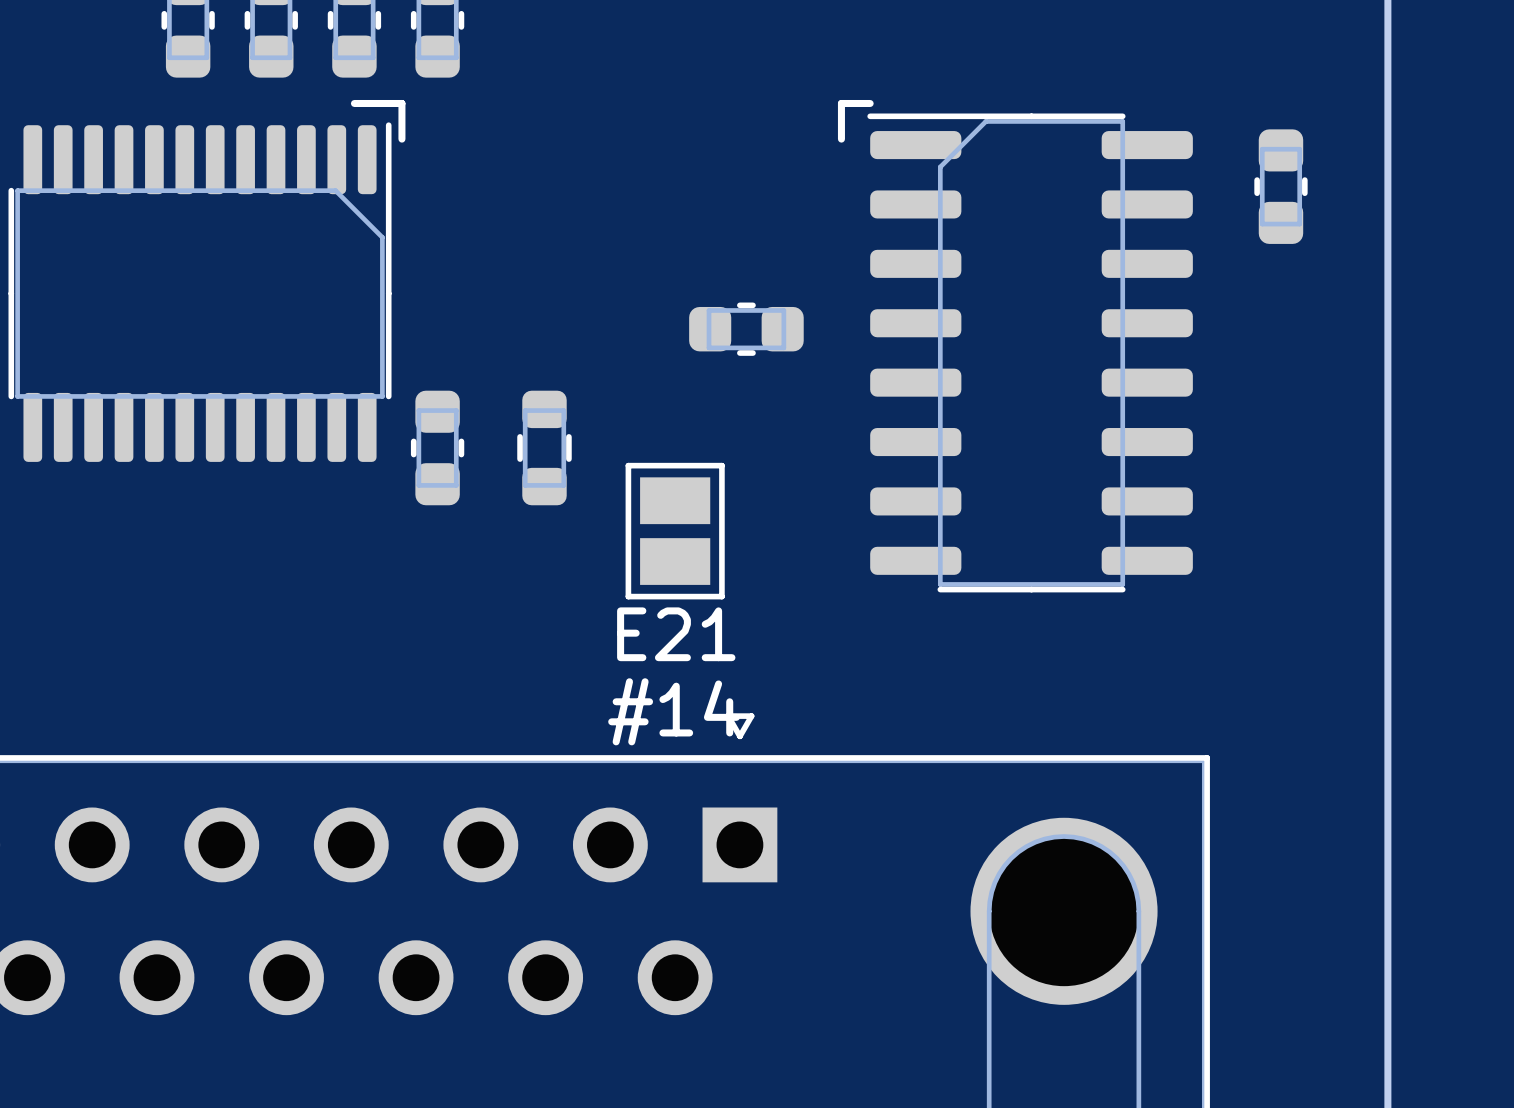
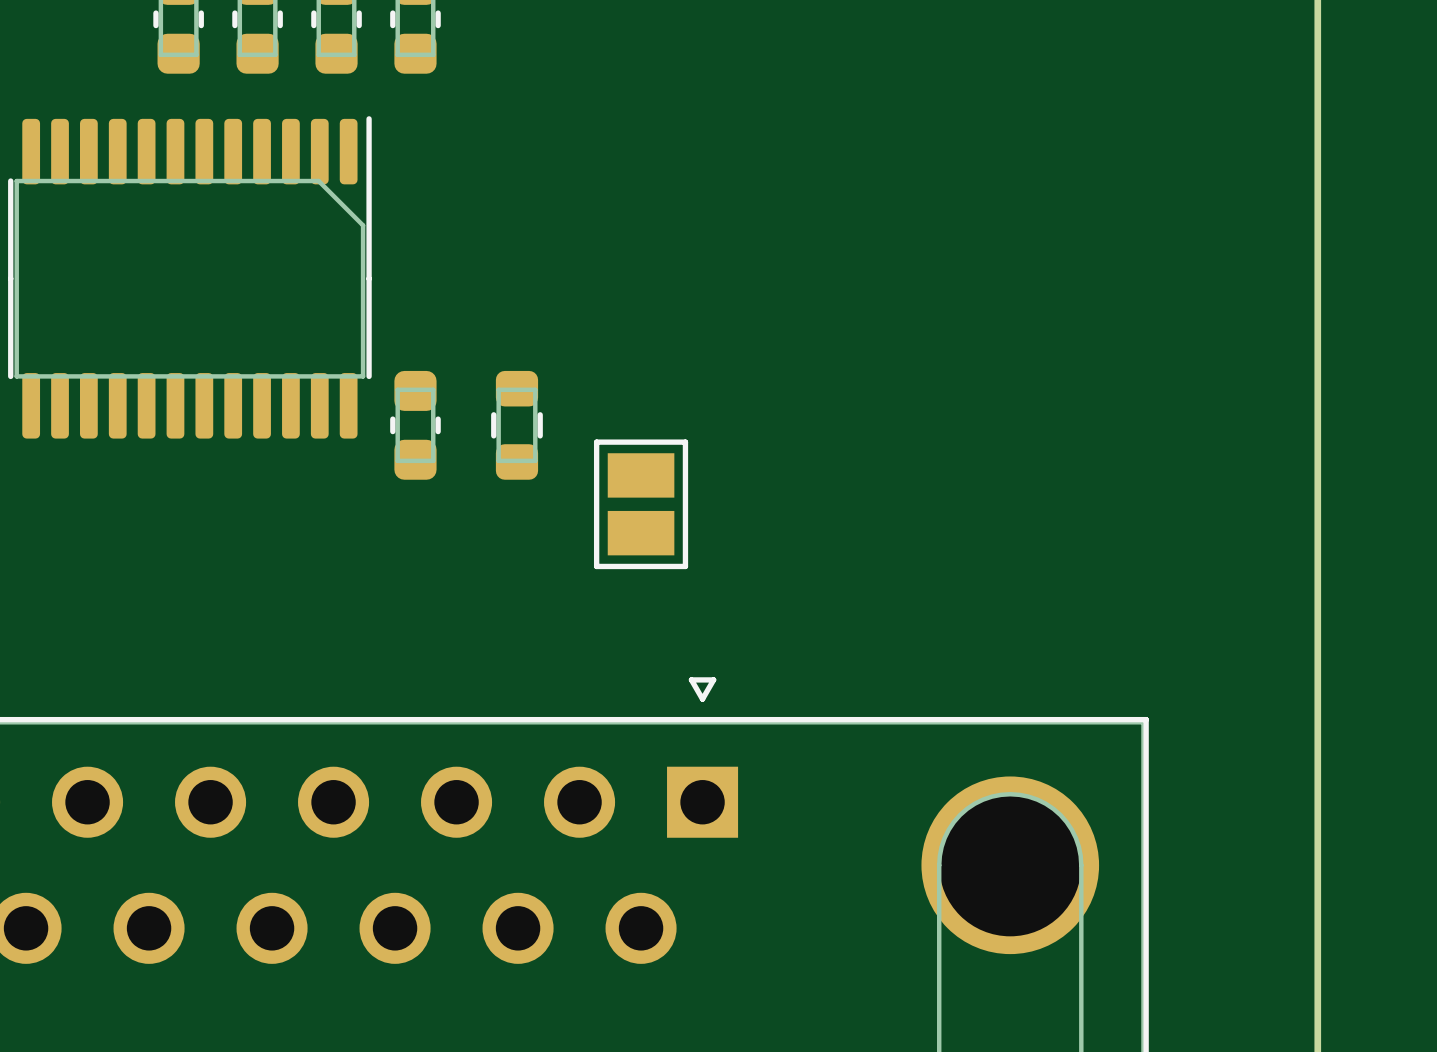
line: (354, 103) (401, 103) (401, 139) -> none
line: (870, 103) (841, 103) (841, 139) -> none
part: (1280, 186) -> none
part: (746, 329) -> none
part: (1030, 352) -> none
text: E21 (676, 634) -> none
text: #14 (674, 711) -> none

